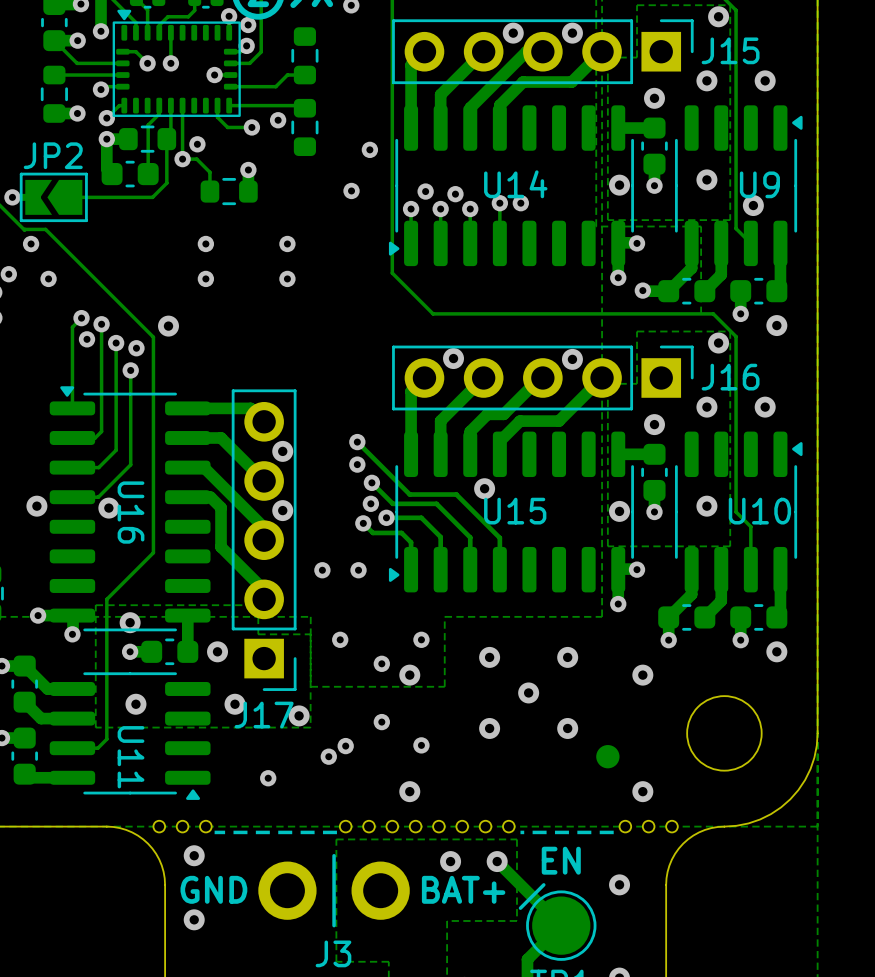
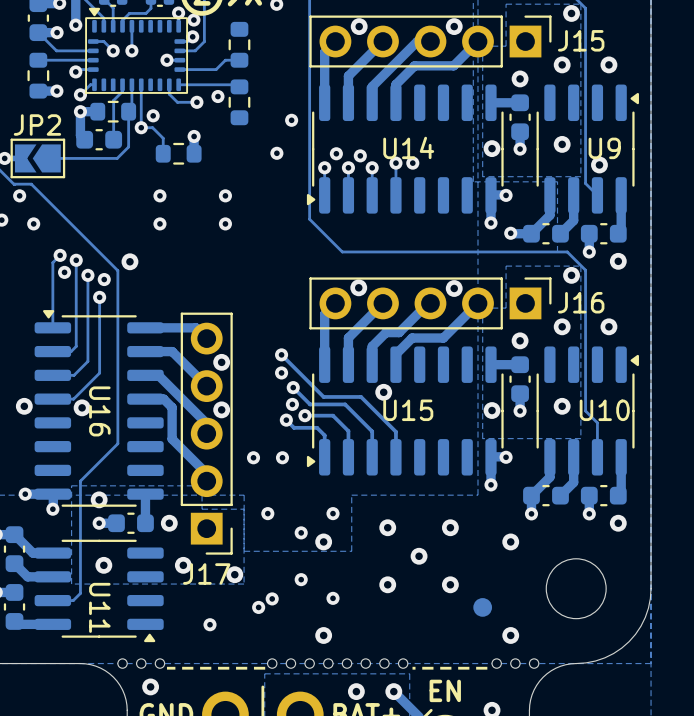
via position: (513, 33) -> (359, 26)

